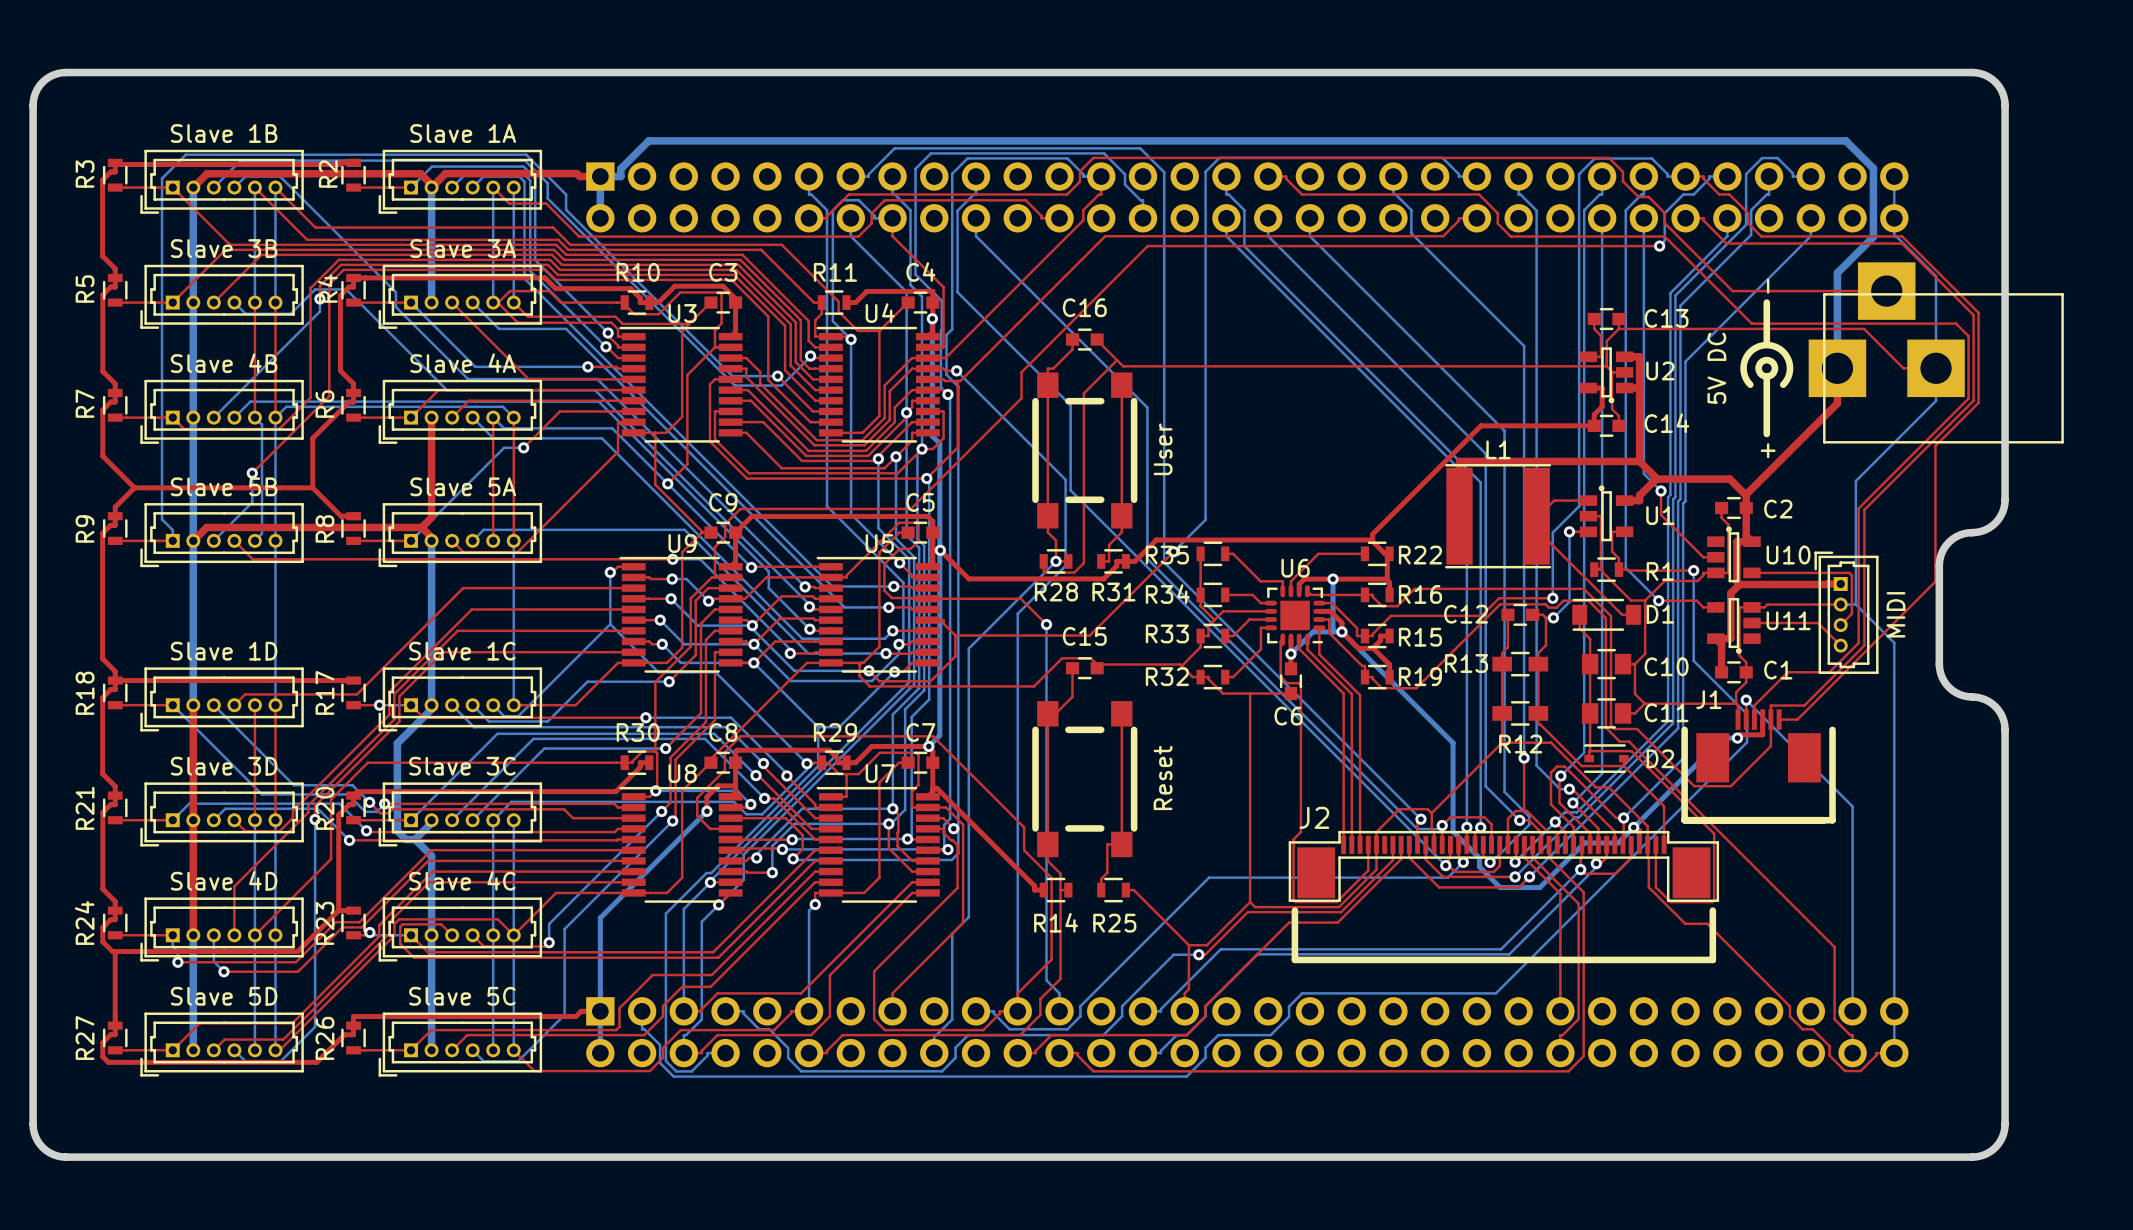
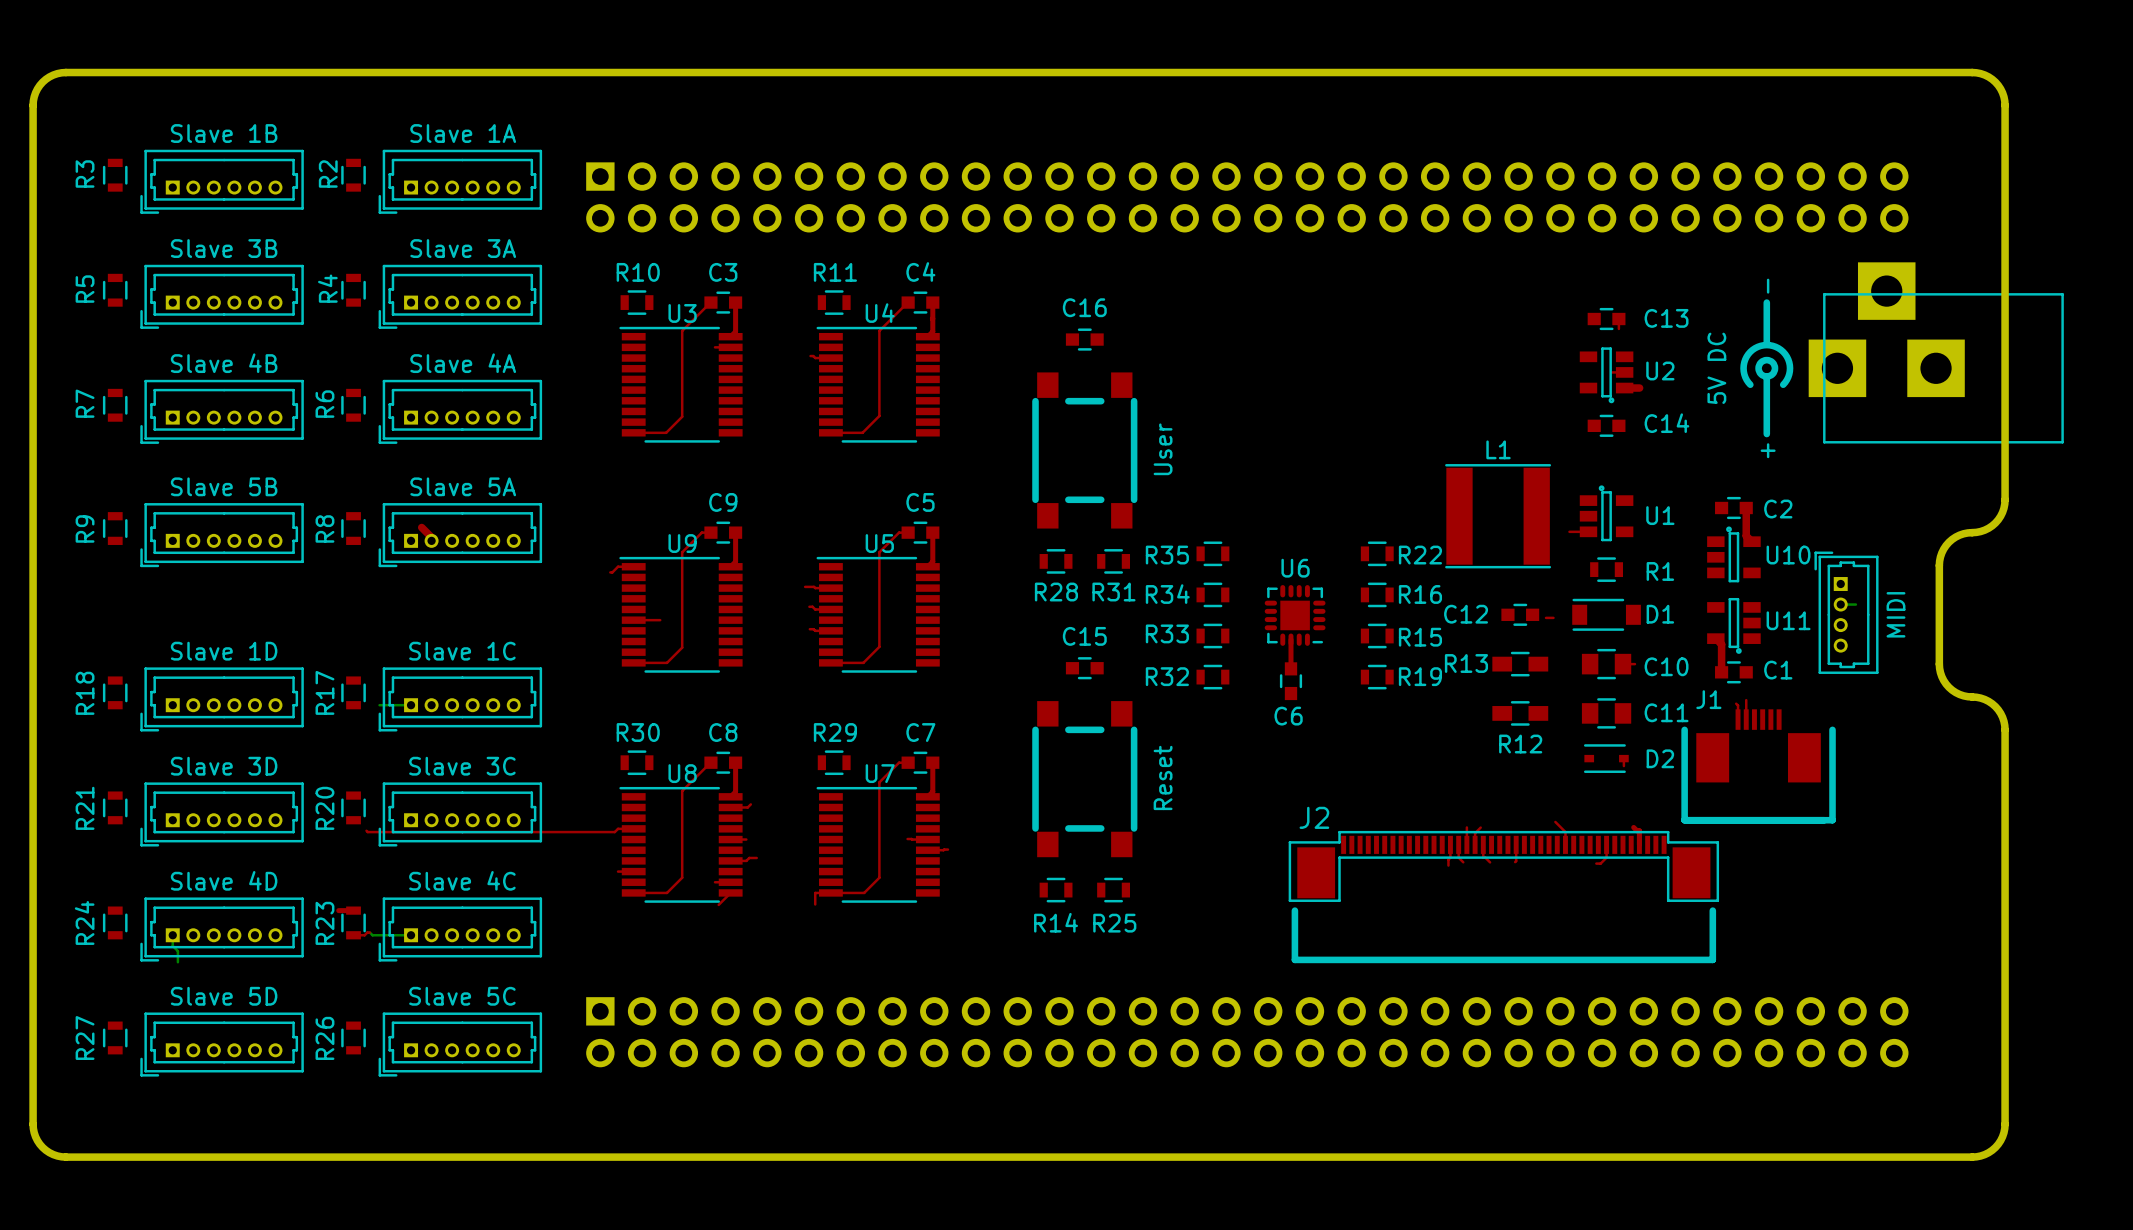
top track: (115, 162) (115, 172) (110, 172) (102, 180) (102, 256) (115, 268) (115, 287) (110, 287) (102, 294) (102, 371) (115, 383) (115, 402) (110, 402) (102, 409) (102, 456) (134, 487) -> none
top track: (353, 162) (339, 164) (115, 164) -> none
top track: (600, 176) (579, 176) (576, 173) (445, 173) (431, 187) -> none
bottom track: (809, 176) (809, 194) (827, 210) (827, 506) (903, 582) (903, 639) (898, 644) (898, 654) (872, 681) (790, 681) (754, 644) (684, 644) (660, 620) -> none
bottom track: (850, 176) (868, 176) (868, 174) (894, 148) (1140, 148) (1164, 172) (1164, 562) (1420, 819) -> none
bottom track: (892, 176) (892, 194) (910, 210) (910, 285) (922, 296) (922, 449) (917, 453) (917, 538) (924, 545) (924, 690) (905, 709) (905, 809) (891, 823) (794, 823) (772, 846) (772, 872) -> none
bottom track: (976, 176) (976, 194) (957, 210) (957, 292) (1070, 405) (1070, 490) (1445, 865) -> none
bottom track: (1101, 176) (1083, 176) (1067, 158) (967, 158) (952, 173) (952, 329) (946, 335) (946, 374) (958, 386) (958, 853) (951, 859) (793, 858) -> none
top track: (1101, 176) (1101, 194) (1083, 210) (1083, 220) (945, 358) (912, 358) (884, 385) (884, 418) (862, 440) (816, 440) (760, 383) (760, 371) (746, 358) (730, 358) -> none
bottom track: (1226, 176) (1226, 194) (1244, 210) (1244, 246) (1480, 482) (1480, 827) -> none
top track: (1268, 176) (1286, 176) (1301, 194) (1479, 194) (1497, 213) (1497, 223) (1510, 236) (1664, 236) (1751, 323) (1956, 323) (1968, 336) (1968, 398) (1858, 508) (1858, 643) (1829, 672) (1787, 672) (1754, 705) (1754, 719) -> none
bottom track: (1393, 176) (1393, 194) (1411, 210) (1411, 233) (1524, 346) (1524, 758) -> none
bottom track: (1476, 176) (1458, 176) (1442, 157) (1219, 157) (1205, 171) (1205, 519) (1173, 551) -> none
bottom track: (1518, 176) (1518, 194) (1536, 210) (1536, 765) (1560, 789) (1569, 789) -> none
bottom track: (1602, 176) (1602, 194) (1584, 210) (1584, 752) (1560, 776) -> none
bottom track: (1643, 176) (1643, 194) (1625, 210) (1625, 567) (1658, 600) -> none
bottom track: (1685, 176) (1667, 176) (1651, 158) (1594, 158) (1579, 174) (1579, 506) (1552, 532) (1552, 598) -> none
top track: (1685, 176) (1703, 176) (1719, 194) (1729, 194) (1748, 213) (1748, 223) (1761, 236) (1902, 236) (1978, 312) (1978, 402) (1935, 445) (1935, 581) (1797, 719) (1779, 719) -> none
bottom track: (1727, 176) (1709, 176) (1693, 194) (1683, 194) (1664, 213) (1664, 241) (1659, 246) -> none
bottom track: (1769, 176) (1769, 194) (1751, 210) (1751, 234) (1680, 305) (1678, 728) (1529, 876) -> none
bottom track: (1810, 176) (1792, 176) (1792, 173) (1777, 158) (1762, 158) (1746, 174) (1746, 224) (1675, 295) (1673, 723) (1578, 817) (1574, 817) (1515, 876) -> none
bottom track: (1894, 176) (1894, 236) (1936, 276) (1936, 400) (1855, 480) (1855, 604) (1894, 642) (1894, 1053) -> none
top track: (432, 186) (420, 173) (207, 173) (193, 187) -> none
top track: (115, 187) (172, 187) (230, 244) (556, 244) (566, 254) (742, 254) (808, 321) (808, 340) (815, 347) (830, 347) -> none
bottom track: (193, 187) (193, 705) -> none
bottom track: (213, 187) (240, 160) (525, 160) (547, 183) (547, 198) (734, 385) (781, 385) (810, 356) -> none
bottom track: (234, 187) (245, 176) (280, 176) (395, 292) (395, 307) (468, 379) (597, 379) (805, 586) -> none
bottom track: (254, 187) (254, 302) -> none
top track: (254, 187) (307, 239) (558, 239) (568, 249) (761, 249) (814, 302) (821, 302) (821, 313) (815, 320) (815, 336) (848, 336) (851, 339) -> none
bottom track: (275, 187) (275, 302) -> none
top track: (275, 187) (315, 227) (553, 227) (570, 244) (781, 244) (838, 301) (838, 311) (858, 330) (879, 330) -> none
top track: (353, 187) (411, 187) -> none
bottom track: (411, 187) (432, 166) (523, 166) (535, 178) (535, 260) (608, 333) -> none
bottom track: (431, 187) (431, 302) -> none
bottom track: (452, 187) (468, 171) (521, 171) (530, 180) (530, 271) (605, 346) -> none
bottom track: (472, 187) (483, 176) (519, 176) (524, 181) (524, 278) (832, 586) (893, 586) -> none
bottom track: (493, 187) (493, 302) -> none
top track: (493, 187) (509, 203) (546, 203) (579, 236) (858, 236) (871, 223) (871, 213) (884, 200) (1025, 200) (1041, 218) (1059, 218) -> none
bottom track: (513, 187) (513, 302) -> none
bottom track: (600, 218) (600, 176) (620, 176) (620, 168) (648, 140) (1845, 140) (1873, 168) (1873, 236) (1837, 272) (1837, 368) -> none
top track: (809, 218) (827, 218) (848, 194) (1067, 194) (1079, 181) (1079, 171) (1093, 157) (1608, 157) (1622, 171) (1622, 181) (1638, 197) (1648, 197) (1664, 213) (1664, 223) (1732, 291) (1886, 291) -> none
bottom track: (850, 218) (850, 236) (906, 292) (906, 535) (919, 547) (919, 688) (892, 714) (892, 808) (802, 808) (756, 854) (756, 857) -> none
bottom track: (892, 218) (874, 218) (858, 200) (842, 200) (832, 210) (832, 321) (851, 339) (851, 514) (899, 562) -> none
top track: (892, 218) (892, 236) (943, 287) (943, 347) (927, 347) -> none
bottom track: (976, 218) (976, 236) (1147, 407) (1147, 558) (1417, 829) (1438, 829) (1442, 825) -> none
bottom track: (1142, 218) (1142, 200) (1125, 184) (1125, 174) (1104, 153) (930, 153) (915, 168) (915, 274) (941, 300) (940, 387) (950, 396) (950, 818) (944, 824) (944, 848) -> none
bottom track: (1226, 218) (1226, 236) (1466, 476) (1466, 827) -> none
bottom track: (1268, 218) (1268, 236) (1485, 453) (1485, 786) (1519, 820) -> none
bottom track: (1309, 218) (1309, 236) (1504, 430) (1504, 791) (1529, 816) (1529, 824) (1490, 862) -> none
top track: (1476, 218) (1458, 218) (1443, 236) (1105, 236) (960, 381) (927, 379) -> none
bottom track: (1602, 218) (1602, 773) (1572, 802) -> none
bottom track: (1643, 218) (1643, 473) (1661, 490) -> none
top track: (1685, 218) (1703, 218) (1703, 220) (1726, 243) (1902, 243) (1973, 315) (1973, 400) (1864, 509) (1864, 645) (1804, 705) (1770, 705) (1770, 746) (1730, 786) (1694, 786) (1637, 729) (1614, 729) (1611, 725) (1611, 616) (1583, 588) (1414, 588) (1397, 606) (1382, 606) (1372, 594) (1311, 594) (1307, 591) -> none
bottom track: (1727, 218) (1727, 236) (1670, 293) (1668, 721) (1576, 812) (1564, 812) (1515, 862) -> none
bottom track: (1810, 218) (1810, 236) (1685, 361) (1683, 758) (1623, 817) -> none
top track: (1659, 246) (1147, 246) (1021, 372) (1021, 398) (910, 508) (740, 508) (725, 524) (725, 536) (714, 547) (714, 577) -> none
via: (1659, 246) -> none
bottom track: (319, 298) (319, 311) (213, 417) -> none
top track: (319, 298) (319, 285) (340, 264) (547, 264) (557, 274) (734, 274) (785, 325) (785, 370) (815, 400) (830, 400) -> none
via: (319, 298) -> none
top track: (115, 302) (172, 302) (225, 249) (554, 249) (564, 259) (740, 259) (800, 320) (800, 359) (809, 368) (830, 368) -> none
top track: (213, 302) (261, 254) (552, 254) (562, 264) (738, 264) (795, 322) (795, 362) (813, 379) (830, 379) -> none
bottom track: (234, 302) (245, 313) (290, 313) (315, 289) (346, 289) (447, 390) (595, 390) (809, 604) (809, 606) -> none
top track: (254, 302) (254, 417) -> none
top track: (275, 302) (275, 417) -> none
top track: (353, 302) (411, 302) -> none
bottom track: (411, 302) (475, 366) (587, 366) -> none
top track: (452, 302) (528, 379) (633, 379) -> none
bottom track: (472, 302) (498, 328) (566, 328) (844, 607) (888, 607) -> none
top track: (493, 302) (497, 302) (517, 322) (611, 322) (618, 329) (618, 336) (633, 336) -> none
top track: (513, 302) (527, 316) (615, 316) (622, 323) (689, 323) -> none
top track: (622, 302) (634, 314) (658, 314) (680, 292) (719, 292) (721, 294) (721, 323) (714, 330) (714, 347) (687, 375) (687, 464) (667, 483) -> none
top track: (624, 302) (560, 302) (549, 291) (509, 291) (498, 302) -> none
top track: (735, 302) (735, 298) (722, 286) (674, 286) (658, 302) (640, 302) (640, 298) (630, 288) (555, 288) (544, 277) (353, 277) (353, 287) (348, 287) (340, 295) (340, 370) (353, 383) (353, 402) (348, 402) (312, 438) (312, 487) -> none
top track: (846, 302) (855, 302) (866, 291) (932, 291) (932, 302) -> none
bottom track: (932, 318) (932, 436) (939, 443) (939, 735) (928, 746) -> none
via: (932, 318) -> none
top track: (1594, 319) (1594, 328) (1600, 335) (1600, 356) (1588, 356) -> none
top track: (608, 333) (608, 335) (618, 347) (633, 347) -> none
via: (608, 333) -> none
via: (851, 339) -> none
top track: (1072, 339) (1072, 349) (1053, 368) (1047, 368) (1047, 532) (1056, 540) (1056, 561) (1068, 561) -> none
top track: (1097, 339) (1123, 366) (1606, 366) -> none
top track: (605, 346) (618, 358) (633, 358) -> none
via: (605, 346) -> none
via: (810, 356) -> none
top track: (1624, 356) (1639, 356) (1639, 461) -> none
top track: (1117, 360) (1083, 393) (1083, 563) (1074, 572) (1043, 572) (1043, 561) -> none
top track: (587, 366) (633, 368) -> none
via: (587, 366) -> none
top track: (1606, 366) (1612, 371) (1612, 409) (1618, 415) (1618, 425) -> none
top track: (1606, 366) (1606, 341) (1618, 328) (1864, 328) (1903, 368) (1936, 368) -> none
top track: (730, 368) (746, 368) (746, 377) (814, 445) (864, 445) (889, 420) (889, 391) (912, 368) (956, 370) -> none
top track: (1837, 368) (1837, 403) (1746, 494) (1746, 507) -> none
bottom track: (956, 370) (1065, 479) (1065, 565) (1017, 613) (1017, 1011) -> none
via: (956, 370) -> none
bottom track: (777, 376) (732, 376) (566, 209) (566, 194) (526, 154) (185, 154) (162, 178) (162, 519) (172, 530) (172, 540) -> none
top track: (777, 376) (813, 411) (830, 411) -> none
via: (777, 376) -> none
top track: (730, 379) (714, 379) (709, 384) (709, 441) (746, 478) (926, 478) (957, 447) (957, 381) -> none
top track: (1121, 385) (1121, 532) (1109, 544) (1109, 561) (1101, 561) -> none
top track: (1588, 388) (1602, 388) (1602, 406) (1594, 414) (1594, 425) (1481, 425) (1372, 534) (1372, 541) (1385, 553) (1389, 553) -> none
top track: (633, 390) (438, 390) (411, 417) (353, 417) -> none
top track: (730, 390) (747, 390) (808, 450) (866, 450) (894, 422) (894, 407) (912, 390) (943, 390) (947, 394) -> none
top track: (830, 390) (815, 390) (790, 365) (790, 324) (736, 269) (559, 269) (549, 259) (338, 259) (310, 288) (310, 397) (279, 429) (184, 429) (172, 417) (115, 417) -> none
via: (947, 394) -> none
top track: (633, 400) (468, 400) (452, 417) -> none
top track: (730, 400) (751, 400) (806, 455) (868, 455) (906, 417) (906, 412) (912, 407) (912, 400) (927, 400) -> none
top track: (633, 411) (560, 411) (523, 447) -> none
top track: (730, 411) (714, 411) (714, 439) (748, 473) (897, 473) (922, 449) (932, 449) (943, 438) (943, 411) (927, 411) -> none
via: (906, 412) -> none
bottom track: (234, 417) (250, 401) (598, 401) (768, 571) (768, 588) (809, 629) -> none
bottom track: (254, 417) (262, 424) (262, 533) (254, 540) -> none
top track: (431, 417) (431, 517) (421, 527) (206, 527) (193, 540) -> none
bottom track: (472, 417) (493, 438) (601, 438) (802, 638) (884, 638) (892, 630) -> none
bottom track: (493, 417) (503, 428) (612, 428) (751, 567) -> none
top track: (493, 417) (493, 540) -> none
bottom track: (513, 417) (502, 406) (286, 406) (275, 417) (275, 705) -> none
top track: (513, 417) (513, 540) -> none
top track: (633, 422) (618, 422) (618, 451) (517, 552) (463, 552) (452, 540) -> none
top track: (730, 422) (763, 422) (802, 460) (876, 460) (878, 455) (912, 422) (927, 422) -> none
top track: (830, 422) (810, 422) (768, 380) (768, 316) (731, 279) (555, 279) (545, 269) (343, 269) (329, 284) (329, 396) (252, 473) -> none
top track: (655, 432) (655, 484) (703, 532) -> none
top track: (730, 432) (746, 432) (781, 468) (884, 468) (912, 440) (912, 432) (927, 432) -> none
bottom track: (523, 447) (504, 447) (411, 540) -> none
via: (523, 447) -> none
via: (922, 449) -> none
bottom track: (896, 456) (896, 538) (914, 556) (914, 684) (743, 854) (743, 879) (701, 921) (701, 1019) (683, 1035) (683, 1053) -> none
via: (896, 456) -> none
bottom track: (878, 458) (878, 528) (909, 559) (909, 682) (683, 909) (683, 1011) -> none
via: (878, 458) -> none
top track: (1639, 461) (1459, 461) (1459, 516) -> none
top track: (1639, 461) (1656, 479) -> none
bottom track: (252, 473) (252, 502) (213, 540) -> none
via: (252, 473) -> none
bottom track: (926, 478) (929, 480) (929, 699) (911, 717) (911, 834) (907, 839) (792, 839) -> none
via: (926, 478) -> none
top track: (1656, 479) (1729, 479) (1746, 495) -> none
top track: (1656, 479) (1639, 495) (1639, 500) (1624, 500) -> none
via: (667, 483) -> none
top track: (134, 487) (115, 507) (115, 525) (110, 525) (102, 533) (102, 658) (115, 671) (115, 689) (110, 689) (102, 697) (102, 773) (115, 786) (115, 804) (110, 804) (102, 812) (102, 889) (115, 901) (115, 919) (110, 919) (102, 927) (102, 941) (112, 951) (297, 951) (338, 910) (338, 814) (348, 804) (353, 804) (353, 795) (357, 791) (615, 791) (640, 767) (640, 762) (649, 762) -> none
top track: (134, 487) (312, 487) -> none
top track: (312, 487) (341, 516) (353, 516) -> none
top track: (1661, 490) (1661, 514) (1703, 557) (1715, 557) -> none
via: (1661, 490) -> none
top track: (1588, 500) (1554, 500) (1538, 516) -> none
top track: (1721, 507) (1721, 517) (1728, 524) (1728, 572) (1703, 572) (1697, 581) (1664, 581) (1645, 600) -> none
top track: (1538, 516) (1538, 531) (1622, 614) (1633, 614) -> none
top track: (1588, 516) (1600, 516) (1600, 567) (1599, 569) -> none
bottom track: (1569, 531) (1569, 601) (1553, 617) -> none
via: (1569, 531) -> none
top track: (1624, 531) (1612, 531) (1612, 551) (1618, 558) (1618, 569) (1693, 570) -> none
top track: (735, 532) (751, 516) (927, 516) (932, 521) (932, 532) -> none
top track: (115, 540) (172, 540) -> none
top track: (234, 540) (252, 559) (672, 559) -> none
top track: (353, 540) (411, 540) -> none
bottom track: (431, 540) (431, 709) (397, 743) (397, 831) (405, 839) (415, 839) -> none
bottom track: (472, 540) (483, 529) (684, 529) (808, 653) (886, 653) -> none
bottom track: (513, 540) (513, 705) -> none
top track: (1372, 540) (1156, 540) (1135, 561) (1116, 561) (1116, 565) (1103, 578) (968, 578) (940, 550) (932, 550) -> none
top track: (1751, 541) (1737, 541) (1737, 581) (1739, 584) -> none
via: (940, 550) -> none
top track: (1173, 551) (1089, 635) (955, 635) -> none
via: (1173, 551) -> none
top track: (1200, 553) (1200, 606) (1214, 620) -> none
top track: (1225, 553) (1233, 553) (1260, 581) (1282, 581) (1282, 591) -> none
top track: (1364, 553) (1318, 553) (1290, 581) (1290, 591) -> none
top track: (1387, 553) (1389, 594) -> none
bottom track: (672, 559) (700, 559) (790, 649) (790, 653) -> none
via: (672, 559) -> none
bottom track: (1056, 561) (968, 648) (968, 917) (952, 933) (952, 1019) (934, 1035) (934, 1053) -> none
via: (1056, 561) -> none
top track: (899, 562) (912, 577) (927, 577) -> none
via: (899, 562) -> none
top track: (830, 566) (751, 567) -> none
via: (751, 567) -> none
top track: (1594, 569) (1602, 569) (1631, 600) (1645, 600) -> none
bottom track: (1693, 570) (1693, 660) (1747, 714) (1747, 742) (1495, 993) (1302, 993) (1289, 1006) (1289, 1016) (1270, 1035) (1218, 1035) (1205, 1047) (1205, 1057) (1186, 1076) (673, 1076) (660, 1062) (660, 1045) (642, 1029) (642, 1011) -> none
via: (1693, 570) -> none
bottom track: (610, 572) (610, 624) -> none
via: (610, 572) -> none
top track: (1751, 572) (1849, 572) (1851, 575) (1851, 613) (1840, 625) -> none
top track: (633, 577) (672, 579) -> none
top track: (730, 577) (711, 577) (690, 598) (690, 646) (655, 682) (655, 751) -> none
bottom track: (672, 579) (686, 579) (708, 601) -> none
via: (672, 579) -> none
bottom track: (1333, 579) (1333, 631) -> none
via: (1333, 579) -> none
top track: (1387, 579) (1304, 579) (1299, 584) (1299, 591) -> none
top track: (1739, 584) (1730, 593) (1730, 638) (1715, 638) -> none
top track: (1840, 584) (1739, 584) -> none
via: (805, 586) -> none
top track: (893, 586) (927, 588) -> none
via: (893, 586) -> none
top track: (633, 588) (463, 588) (356, 694) (245, 694) (234, 705) -> none
top track: (730, 588) (708, 588) (695, 600) (695, 655) (669, 681) -> none
top track: (1225, 594) (1252, 594) (1260, 603) (1270, 603) -> none
bottom track: (671, 598) (697, 625) (752, 625) (752, 628) (794, 670) (868, 670) -> none
via: (671, 598) -> none
top track: (830, 598) (815, 598) (812, 596) (781, 596) (752, 625) (746, 620) (730, 620) -> none
top track: (1552, 598) (1499, 598) (1481, 615) (1390, 615) (1372, 636) (1357, 636) (1357, 628) (1332, 603) (1319, 603) -> none
via: (1552, 598) -> none
top track: (1645, 600) (1645, 653) (1634, 664) (1634, 694) (1644, 703) -> none
top track: (1658, 600) (1696, 600) (1703, 607) (1715, 607) -> none
via: (1658, 600) -> none
top track: (708, 601) (714, 598) (745, 598) (766, 577) (846, 577) (899, 522) (916, 522) (918, 524) (918, 541) (910, 548) (899, 548) (884, 564) (884, 590) (891, 598) (1020, 598) (1046, 624) -> none
via: (708, 601) -> none
top track: (1840, 604) (1767, 604) (1764, 607) (1739, 607) (1739, 655) (1746, 662) (1746, 682) (1736, 692) (1736, 703) (1644, 703) -> none
via: (809, 606) -> none
top track: (888, 607) (927, 609) -> none
via: (888, 607) -> none
top track: (633, 609) (471, 609) (389, 691) (389, 714) (293, 811) (293, 817) (279, 831) (245, 831) (234, 820) -> none
top track: (730, 609) (714, 609) (700, 623) (700, 713) (665, 748) -> none
top track: (1270, 611) (1223, 611) (1208, 626) (1208, 636) (1200, 636) (1200, 647) (1181, 666) -> none
top track: (1319, 611) (1330, 611) (1341, 622) (1341, 631) (1358, 648) (1372, 648) (1380, 640) (1380, 636) (1389, 636) -> none
top track: (1507, 614) (1507, 647) (1502, 652) (1502, 742) -> none
top track: (1532, 614) (1542, 614) (1546, 617) (1546, 645) (1538, 652) (1538, 724) (1581, 766) (1623, 766) (1664, 806) (1664, 844) -> none
top track: (1579, 614) (1579, 628) (1590, 639) (1590, 751) -> none
via: (1553, 617) -> none
top track: (1270, 619) (1249, 619) (1233, 636) (1225, 636) -> none
top track: (1319, 619) (1329, 619) (1329, 633) (1362, 665) (1364, 665) (1364, 677) (1372, 677) (1382, 688) (1416, 688) (1500, 604) (1545, 604) (1548, 607) (1556, 607) (1563, 600) (1588, 600) (1605, 618) (1605, 727) (1619, 741) (1629, 741) (1834, 947) (1834, 1019) (1852, 1035) (1852, 1053) -> none
via: (660, 620) -> none
top track: (830, 620) (779, 618) (754, 644) (749, 644) (746, 641) (730, 641) -> none
top track: (927, 620) (943, 620) (943, 623) (955, 635) -> none
top track: (1751, 623) (1818, 623) (1840, 645) -> none
bottom track: (610, 624) (518, 716) (504, 716) (493, 705) -> none
bottom track: (610, 624) (658, 672) (715, 672) (807, 763) (807, 769) (762, 814) (746, 814) (733, 801) (511, 801) (493, 820) (493, 1050) -> none
bottom track: (1046, 624) (1046, 980) (1059, 993) (1059, 1011) -> none
via: (1046, 624) -> none
via: (752, 625) -> none
top track: (1270, 627) (1260, 627) (1260, 649) (1233, 677) (1225, 677) -> none
top track: (1319, 627) (1319, 654) (1360, 695) (1360, 844) -> none
via: (809, 629) -> none
top track: (633, 630) (457, 630) (394, 694) (394, 719) (308, 805) (308, 812) (234, 886) (234, 935) -> none
top track: (730, 630) (714, 630) (705, 639) (705, 722) (670, 757) (670, 802) (661, 811) -> none
top track: (892, 630) (927, 630) -> none
via: (892, 630) -> none
via: (1341, 631) -> none
top track: (955, 635) (955, 656) (930, 681) (879, 681) (868, 670) -> none
top track: (1282, 639) (1280, 641) (1280, 676) (1287, 683) (1298, 683) (1300, 685) (1300, 832) (1293, 839) (1293, 899) (1295, 902) (1336, 902) (1368, 870) (1368, 844) -> none
top track: (1299, 639) (1299, 649) (1343, 693) (1343, 844) -> none
top track: (1307, 639) (1307, 649) (1351, 694) (1351, 844) -> none
top track: (633, 641) (662, 644) -> none
top track: (830, 641) (775, 641) (753, 662) (730, 662) -> none
top track: (927, 641) (912, 641) (909, 644) (898, 644) -> none
bottom track: (662, 644) (680, 662) (753, 662) (818, 727) -> none
via: (662, 644) -> none
via: (754, 644) -> none
via: (898, 644) -> none
top track: (1372, 648) (1389, 664) (1389, 677) -> none
top track: (633, 652) (443, 652) (399, 696) (399, 721) (315, 805) (315, 819) -> none
top track: (730, 652) (714, 652) (714, 720) (675, 759) (675, 818) (672, 821) -> none
top track: (830, 652) (790, 653) -> none
top track: (927, 652) (886, 653) -> none
via: (790, 653) -> none
via: (886, 653) -> none
bottom track: (1290, 654) (1313, 631) (1341, 631) (1453, 743) (1453, 831) (1479, 857) (1479, 866) (1500, 887) (1539, 887) (1584, 842) (1618, 842) (1723, 738) (1737, 738) -> none
via: (1290, 654) -> none
top track: (633, 662) (618, 662) (575, 705) (513, 705) -> none
via: (753, 662) -> none
top track: (830, 662) (806, 662) (710, 759) (710, 762) -> none
top track: (861, 662) (859, 664) (859, 676) (869, 686) (1034, 686) (1062, 658) (1090, 658) (1097, 664) -> none
top track: (927, 662) (912, 662) (903, 671) (894, 671) -> none
top track: (1097, 664) (1180, 664) (1192, 677) (1208, 677) (1222, 693) (1290, 693) -> none
top track: (1072, 668) (1072, 696) (1047, 721) -> none
via: (868, 670) -> none
bottom track: (894, 671) (839, 727) (818, 727) -> none
via: (894, 671) -> none
top track: (115, 680) (353, 680) -> none
bottom track: (669, 681) (587, 681) (547, 721) (488, 721) (472, 705) -> none
via: (669, 681) -> none
top track: (1250, 693) (1250, 902) -> none
bottom track: (1746, 700) (1852, 806) (1852, 1011) -> none
via: (1746, 700) -> none
top track: (1644, 703) (1634, 713) (1622, 713) -> none
top track: (115, 705) (172, 705) -> none
bottom track: (172, 705) (262, 794) (347, 794) (365, 811) (376, 811) (384, 803) -> none
top track: (193, 705) (193, 935) -> none
bottom track: (213, 705) (293, 785) (352, 785) (369, 802) -> none
top track: (254, 705) (254, 820) -> none
top track: (275, 705) (275, 820) -> none
top track: (353, 705) (379, 705) -> none
via: (379, 705) -> none
top track: (411, 705) (423, 717) (645, 717) -> none
bottom track: (452, 705) (474, 727) (727, 727) (763, 763) -> none
top track: (1047, 713) (1047, 860) (1060, 873) (1060, 978) (1040, 999) (1040, 1014) (1020, 1035) (842, 1035) (827, 1053) (809, 1053) -> none
top track: (1121, 713) (1121, 844) (1107, 844) (1107, 872) (1101, 878) (1101, 890) -> none
bottom track: (645, 717) (731, 717) (786, 773) (786, 775) -> none
via: (645, 717) -> none
top track: (1762, 719) (1762, 734) (1740, 734) (1737, 738) -> none
bottom track: (818, 727) (818, 766) (711, 873) (706, 873) (665, 913) (665, 1061) (676, 1071) (691, 1071) (707, 1055) (707, 1053) (725, 1053) -> none
via: (1737, 738) -> none
top track: (1502, 742) (1551, 742) (1595, 787) (1608, 787) (1647, 826) (1648, 887) (1685, 923) (1707, 923) (1789, 1006) (1789, 1016) (1802, 1029) (1812, 1029) (1829, 1046) (1829, 1055) (1845, 1071) (1860, 1071) (1876, 1053) (1894, 1053) -> none
top track: (1502, 742) (1431, 813) -> none
via: (928, 746) -> none
bottom track: (665, 748) (544, 748) (472, 820) -> none
via: (665, 748) -> none
top track: (655, 751) (642, 751) (632, 762) (367, 762) (331, 799) (331, 859) (254, 935) -> none
top track: (655, 751) (657, 753) (657, 789) (649, 796) (633, 796) -> none
top track: (1524, 758) (1524, 810) -> none
via: (1524, 758) -> none
top track: (1589, 758) (1589, 751) (1631, 751) (1714, 833) (1714, 900) (1712, 902) (1670, 902) (1655, 887) (1655, 844) -> none
top track: (735, 762) (736, 750) (829, 750) (837, 758) (837, 762) (855, 762) (871, 746) (928, 746) (932, 751) (932, 762) -> none
top track: (763, 763) (763, 766) (815, 818) (830, 818) -> none
via: (763, 763) -> none
top track: (807, 763) (829, 762) (839, 774) (858, 774) (879, 752) (916, 752) (918, 754) (918, 784) (912, 791) (912, 807) (946, 807) (963, 824) (963, 922) (892, 993) (892, 1011) -> none
via: (807, 763) -> none
top track: (846, 774) (846, 796) (830, 796) -> none
bottom track: (756, 775) (714, 733) (497, 733) (411, 820) -> none
top track: (756, 775) (758, 775) (811, 828) (830, 828) -> none
via: (756, 775) -> none
top track: (786, 775) (815, 804) (815, 807) (830, 807) -> none
via: (786, 775) -> none
top track: (1560, 776) (1559, 802) (1590, 832) (1590, 844) -> none
via: (1560, 776) -> none
top track: (735, 785) (718, 785) (706, 797) (706, 811) -> none
top track: (932, 788) (936, 788) (1034, 886) (1034, 890) (1043, 890) -> none
top track: (1569, 789) (1572, 789) (1614, 831) (1614, 844) -> none
via: (1569, 789) -> none
bottom track: (655, 790) (737, 790) (750, 804) -> none
via: (655, 790) -> none
bottom track: (764, 798) (705, 738) (533, 738) (452, 820) -> none
top track: (764, 798) (774, 798) (815, 839) (830, 839) -> none
via: (764, 798) -> none
top track: (369, 802) (380, 813) (388, 813) (392, 809) (564, 809) (573, 818) (633, 818) -> none
via: (369, 802) -> none
top track: (1572, 802) (1598, 828) (1598, 844) -> none
via: (1572, 802) -> none
top track: (384, 803) (614, 803) (618, 807) (633, 807) -> none
via: (384, 803) -> none
via: (750, 804) -> none
top track: (892, 808) (898, 814) (897, 846) (912, 860) (927, 860) -> none
via: (892, 808) -> none
bottom track: (661, 811) (549, 924) (549, 942) -> none
via: (661, 811) -> none
bottom track: (706, 811) (600, 917) (600, 1053) -> none
via: (706, 811) -> none
top track: (1431, 813) (1427, 809) (1399, 809) (1376, 832) (1376, 869) (1338, 907) (1255, 907) (1250, 902) -> none
top track: (1431, 813) (1434, 844) -> none
via: (1623, 817) -> none
top track: (730, 818) (785, 818) (802, 835) (802, 849) (793, 858) -> none
top track: (927, 818) (943, 818) (953, 828) -> none
bottom track: (315, 819) (315, 1026) (280, 1061) (245, 1061) (234, 1050) -> none
via: (315, 819) -> none
top track: (1420, 819) (1417, 822) (1417, 844) -> none
via: (1420, 819) -> none
top track: (115, 820) (172, 820) -> none
bottom track: (172, 820) (189, 803) (339, 803) (366, 830) -> none
bottom track: (213, 820) (225, 808) (317, 808) (349, 840) -> none
bottom track: (254, 820) (254, 1050) -> none
bottom track: (275, 820) (275, 1050) -> none
top track: (353, 820) (411, 820) -> none
bottom track: (431, 820) (431, 822) (415, 839) -> none
bottom track: (513, 820) (513, 1050) -> none
top track: (1519, 820) (1529, 820) (1540, 832) (1540, 844) -> none
via: (1519, 820) -> none
bottom track: (672, 821) (564, 929) (564, 1014) (518, 1061) (483, 1061) (472, 1050) -> none
via: (672, 821) -> none
via: (1555, 821) -> none
top track: (888, 823) (888, 848) (912, 871) (927, 871) -> none
via: (888, 823) -> none
via: (1442, 825) -> none
via: (1466, 827) -> none
via: (1480, 827) -> none
via: (1633, 827) -> none
top track: (730, 828) (710, 828) (697, 815) (697, 797) (724, 770) (724, 752) (740, 736) (933, 736) (1024, 827) (1024, 850) (1051, 877) (1051, 959) (1017, 993) (1017, 1011) (999, 1011) (983, 1030) (885, 1030) (874, 1019) (874, 971) (957, 887) (957, 844) (943, 832) (943, 828) (927, 828) -> none
via: (953, 828) -> none
via: (366, 830) -> none
bottom track: (415, 839) (431, 855) (431, 1050) -> none
top track: (633, 839) (349, 840) -> none
top track: (746, 839) (792, 839) -> none
via: (792, 839) -> none
via: (907, 839) -> none
via: (349, 840) -> none
top track: (1392, 844) (1392, 860) (1341, 912) (1247, 912) (1205, 954) (1198, 954) -> none
top track: (1401, 844) (1401, 859) (1337, 922) (1289, 922) (1205, 1006) (1205, 1016) (1186, 1035) (1051, 1035) (1035, 1053) (1017, 1053) -> none
top track: (1409, 844) (1409, 857) (1439, 887) (1519, 887) (1529, 876) -> none
top track: (1425, 844) (1425, 859) (1443, 876) (1515, 876) -> none
top track: (1442, 844) (1442, 825) (1450, 817) (1484, 817) (1491, 824) (1491, 844) -> none
top track: (1499, 844) (1499, 866) (1493, 871) (1454, 871) (1448, 865) (1445, 865) -> none
top track: (1507, 844) (1507, 818) (1515, 810) (1526, 810) (1547, 832) (1557, 832) (1557, 844) -> none
top track: (1524, 844) (1524, 857) (1560, 893) (1560, 1011) -> none
top track: (1532, 844) (1532, 857) (1578, 903) (1578, 1019) (1560, 1035) (1560, 1053) -> none
top track: (1549, 844) (1549, 857) (1583, 892) (1583, 1056) (1568, 1071) (1093, 1071) (1077, 1053) (1059, 1053) -> none
top track: (1573, 844) (1573, 827) (1550, 804) (1550, 772) (1556, 766) (1564, 766) (1616, 817) (1623, 817) (1622, 844) -> none
top track: (1581, 844) (1580, 869) (1584, 873) (1615, 873) (1631, 857) (1631, 844) -> none
bottom track: (944, 848) (782, 849) -> none
top track: (782, 849) (730, 850) -> none
via: (782, 849) -> none
via: (947, 849) -> none
top track: (633, 850) (431, 850) (359, 922) (335, 922) (295, 962) (177, 962) -> none
top track: (830, 850) (815, 850) (713, 952) (428, 952) (411, 935) -> none
via: (756, 857) -> none
via: (793, 858) -> none
top track: (633, 860) (428, 860) (361, 927) (342, 927) (298, 971) (223, 971) -> none
top track: (830, 860) (815, 860) (718, 957) (414, 957) (400, 943) (400, 926) (402, 924) (441, 924) (452, 935) -> none
bottom track: (1463, 862) (1447, 877) (1209, 877) (1080, 1006) (1080, 1016) (1067, 1029) (1009, 1029) (993, 1011) (976, 1011) -> none
via: (1463, 862) -> none
via: (1490, 862) -> none
via: (1515, 862) -> none
bottom track: (1596, 863) (1596, 867) (1509, 954) (1257, 954) (1205, 1006) (1205, 1016) (1186, 1035) (1176, 1035) (1160, 1053) (1142, 1053) -> none
via: (1596, 863) -> none
via: (1445, 865) -> none
bottom track: (1580, 869) (1501, 949) (1220, 949) (1160, 1009) (1160, 1011) (1142, 1011) -> none
via: (1580, 869) -> none
top track: (618, 871) (432, 871) (379, 925) (379, 936) (292, 1023) (199, 1023) (172, 1050) (115, 1050) -> none
top track: (730, 871) (772, 872) -> none
top track: (830, 871) (815, 871) (711, 975) (652, 975) (619, 1008) (619, 1026) (616, 1030) (431, 1030) (411, 1050) (353, 1050) -> none
via: (772, 872) -> none
via: (1515, 876) -> none
via: (1529, 876) -> none
top track: (633, 882) (429, 882) (389, 922) (389, 933) (283, 1039) (224, 1039) (213, 1050) -> none
via: (710, 882) -> none
top track: (830, 882) (815, 882) (710, 986) (682, 986) (662, 1006) (662, 1016) (644, 1035) (467, 1035) (452, 1050) -> none
top track: (927, 882) (912, 882) (801, 993) (717, 993) (701, 1011) (683, 1011) -> none
top track: (1060, 890) (1068, 890) -> none
top track: (1125, 890) (1133, 890) (1188, 945) -> none
top track: (633, 892) (556, 892) (513, 935) (497, 919) (399, 919) (394, 924) (394, 935) (279, 1050) (275, 1050) -> none
top track: (927, 892) (912, 892) (829, 975) (829, 1016) (811, 1035) (717, 1035) (701, 1053) (683, 1053) -> none
top track: (1250, 902) (1207, 945) (1188, 945) -> none
via: (718, 904) -> none
bottom track: (815, 904) (809, 910) (809, 1011) -> none
via: (815, 904) -> none
via: (369, 932) -> none
top track: (115, 935) (172, 935) -> none
bottom track: (193, 935) (193, 1050) -> none
bottom track: (213, 935) (213, 961) (223, 971) -> none
top track: (472, 935) (483, 946) (545, 946) (549, 942) -> none
via: (549, 942) -> none
top track: (1188, 945) (1188, 989) (1184, 993) (1184, 1011) -> none
top track: (115, 951) (115, 1034) (110, 1034) (102, 1042) (102, 1056) (108, 1062) (316, 1062) (344, 1034) (353, 1034) (353, 1016) (575, 1016) (581, 1011) (600, 1011) -> none
bottom track: (1198, 954) (1173, 954) (1122, 1006) (1122, 1016) (1103, 1035) (968, 1035) (955, 1047) (955, 1057) (942, 1071) (801, 1071) (788, 1058) (788, 1048) (769, 1029) (759, 1029) (743, 1011) (725, 1011) -> none
via: (1198, 954) -> none
via: (177, 962) -> none
via: (223, 971) -> none
top track: (809, 1011) (791, 1011) (774, 1030) (680, 1030) (662, 1047) (662, 1057) (649, 1071) (534, 1071) (513, 1050) -> none

